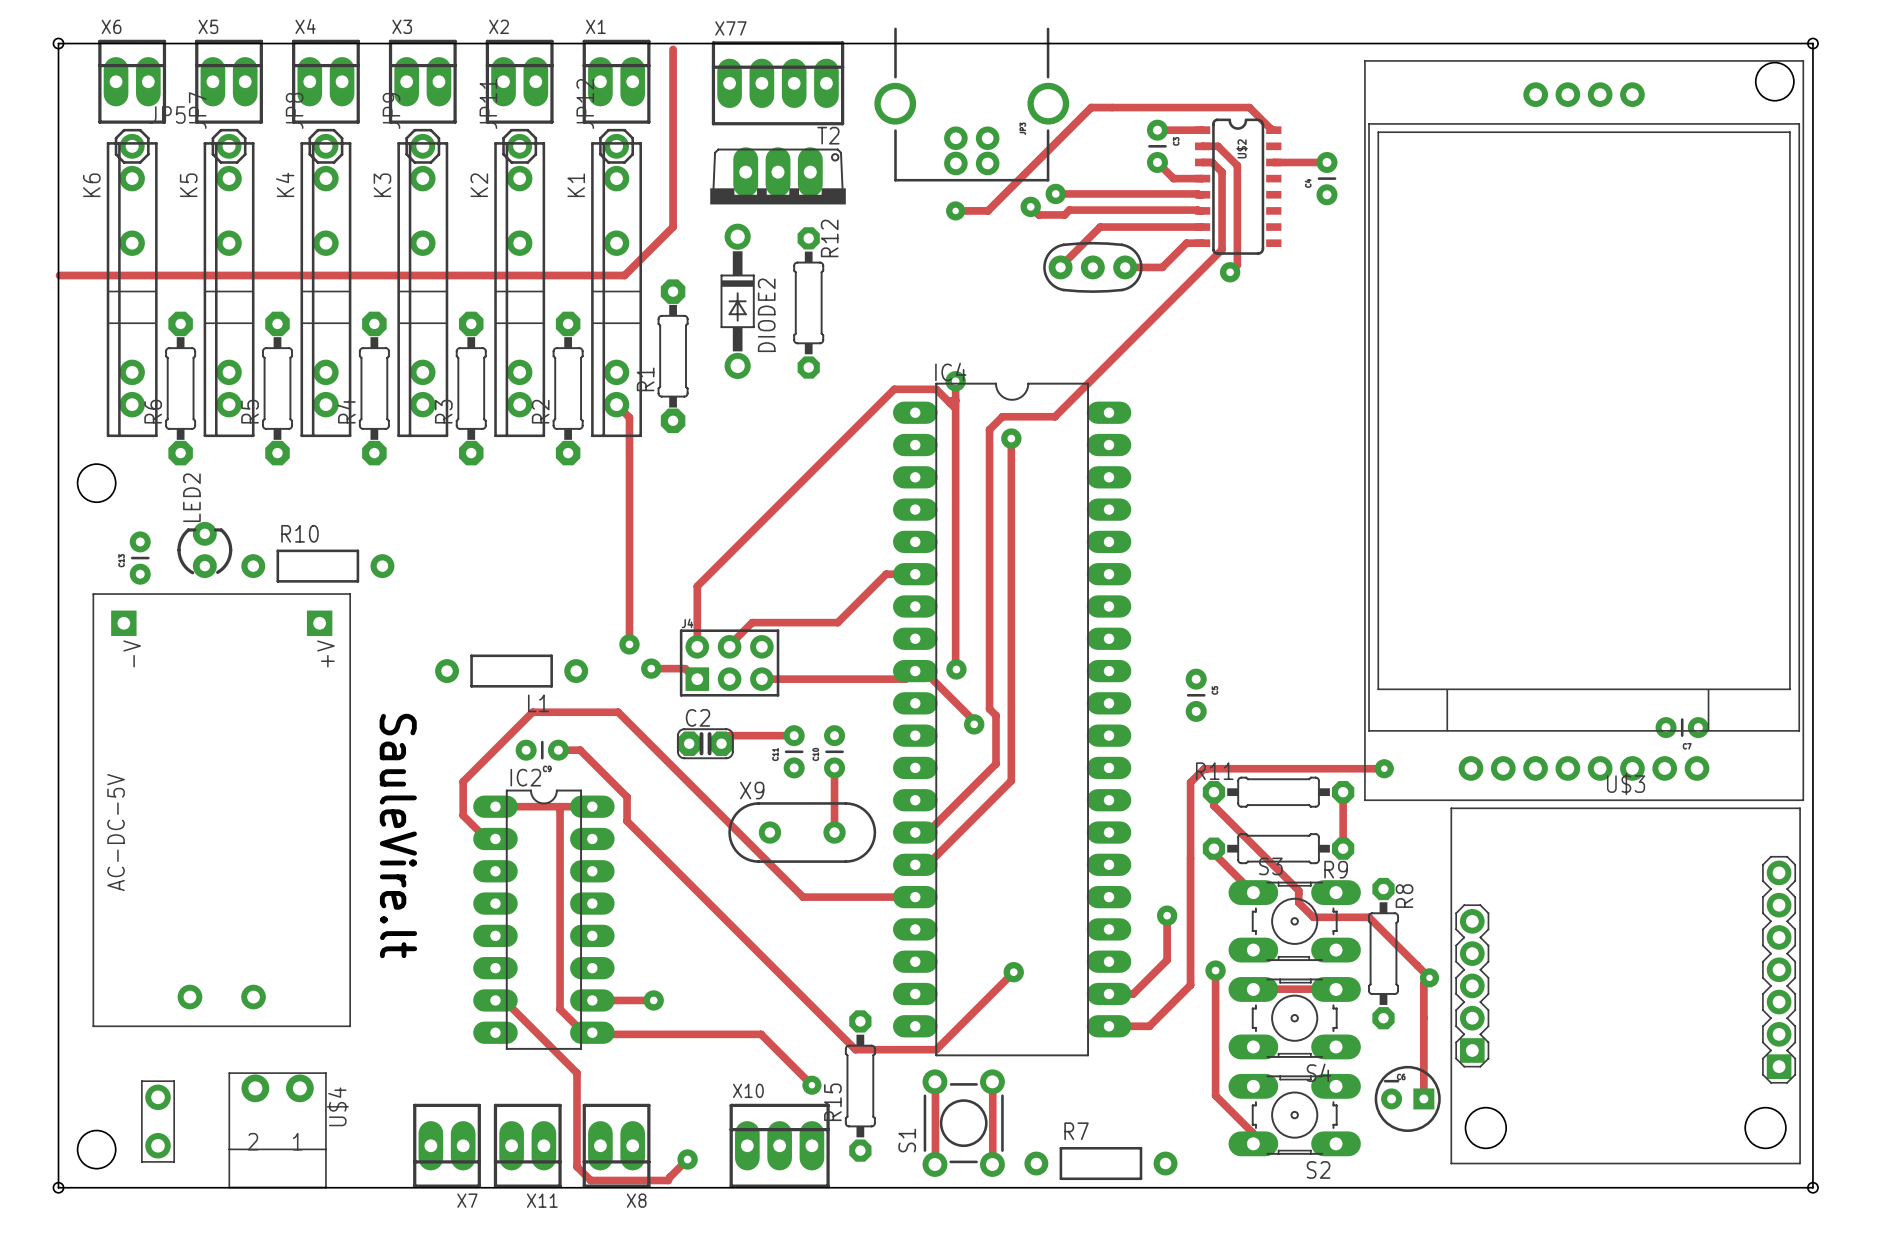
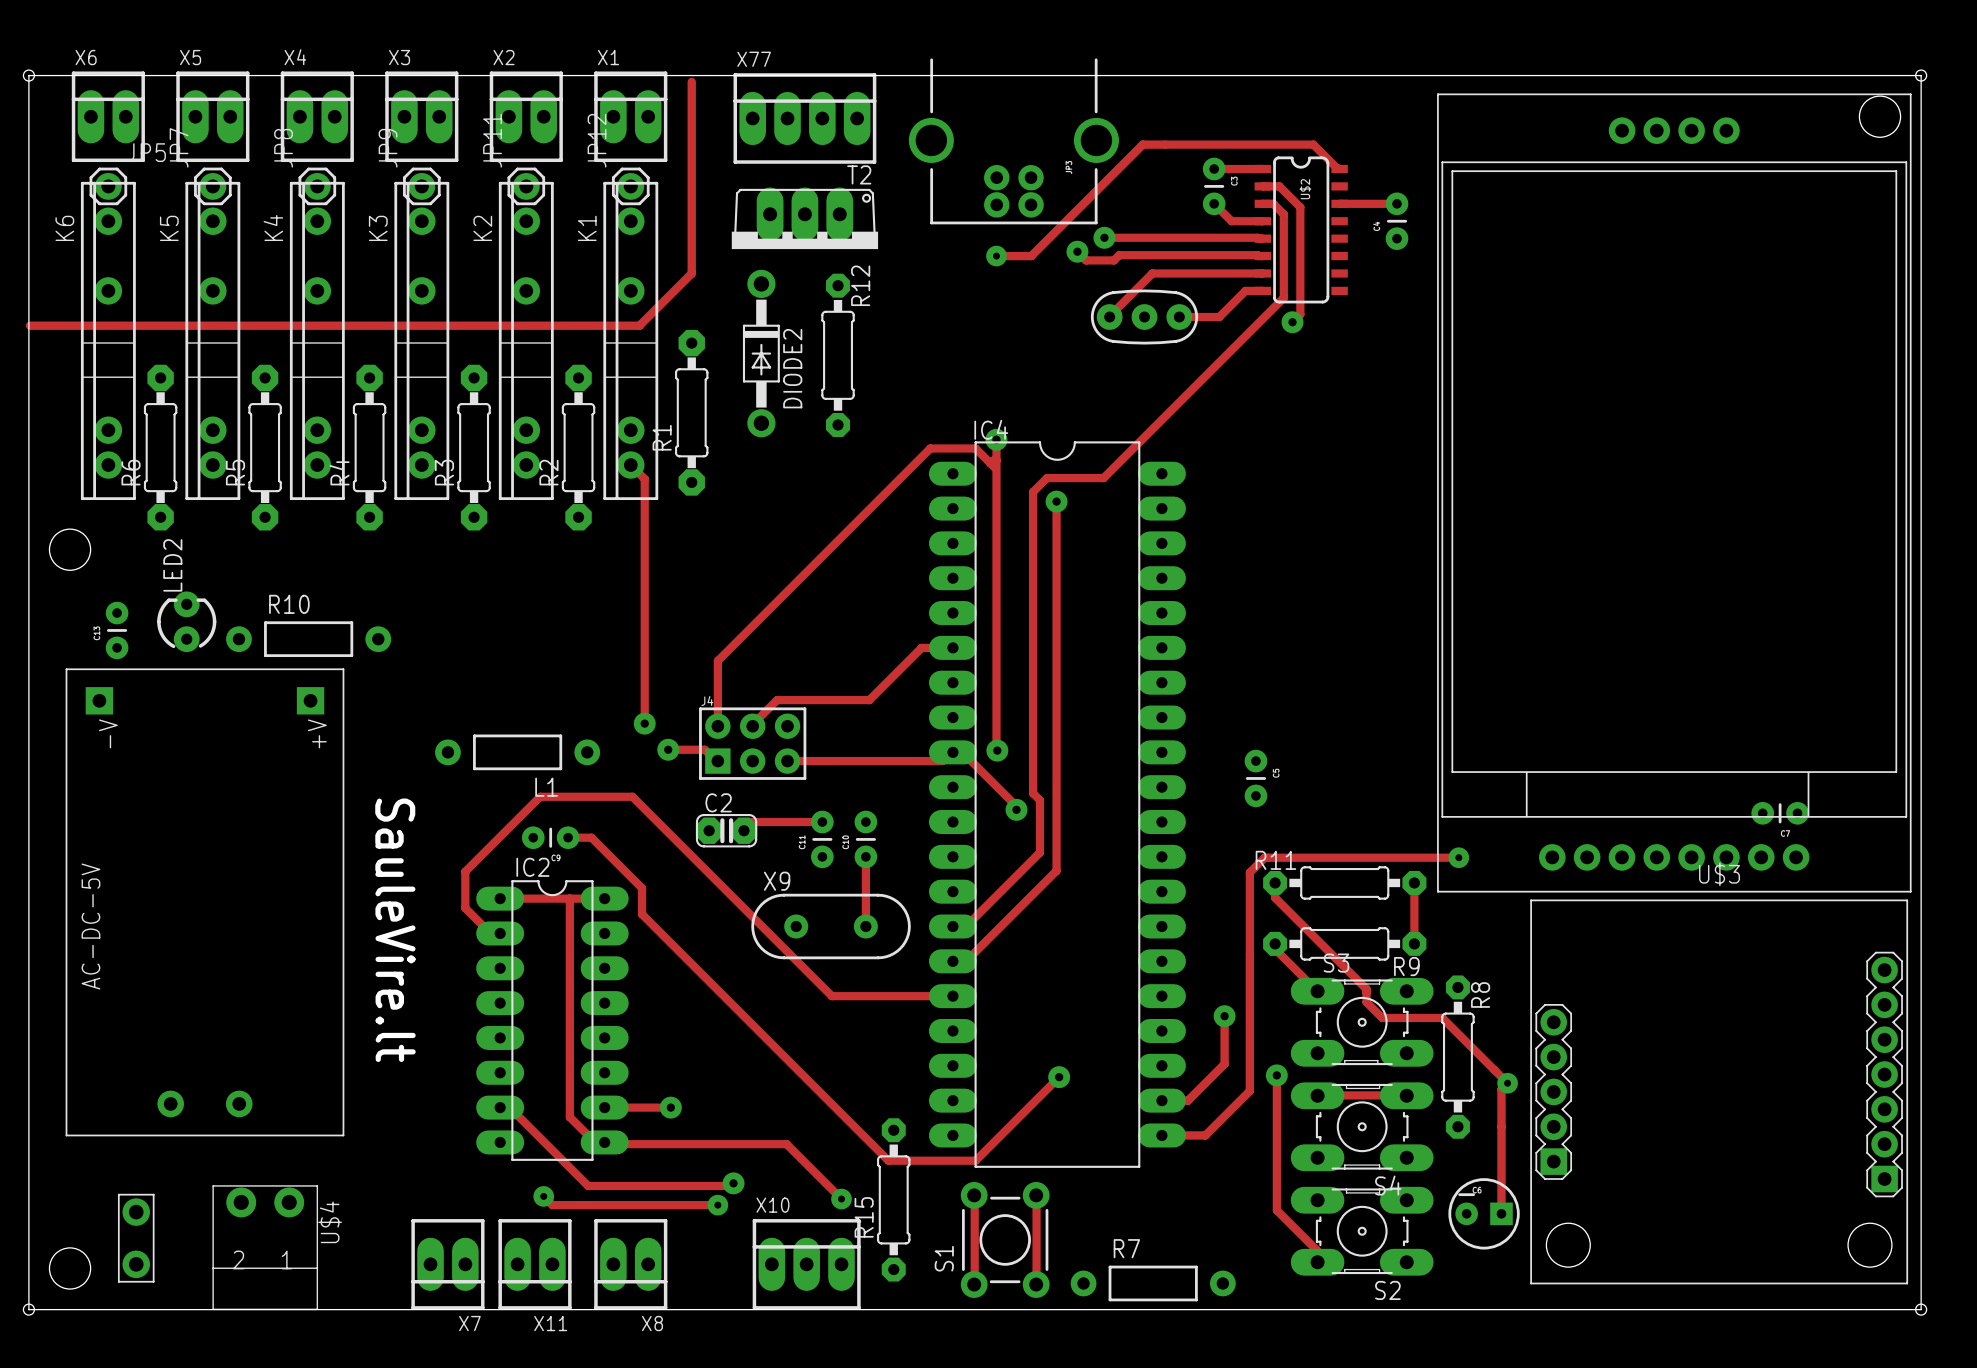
via: none -> (733, 1183)
track: (577, 1073) (577, 1166) (590, 1180) (668, 1180) (687, 1159) -> (588, 1185) (730, 1185) (733, 1183)
track: none -> (543, 1196) (552, 1205) (717, 1205)
via: none -> (543, 1196)
via: none -> (717, 1205)
via: (687, 1159) -> none

